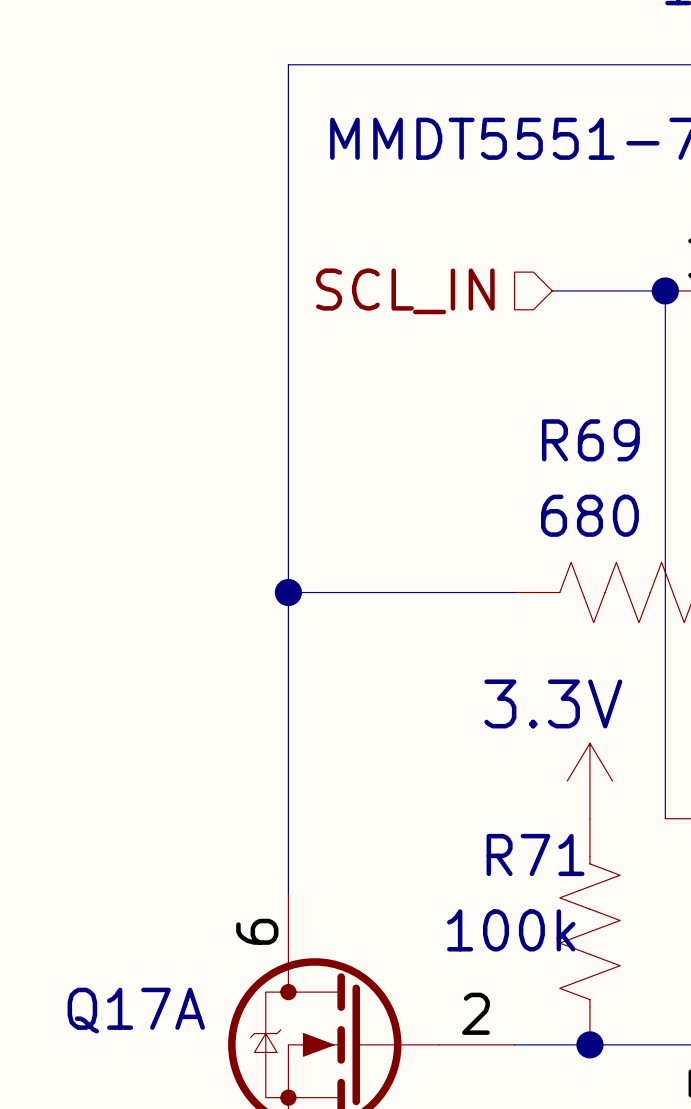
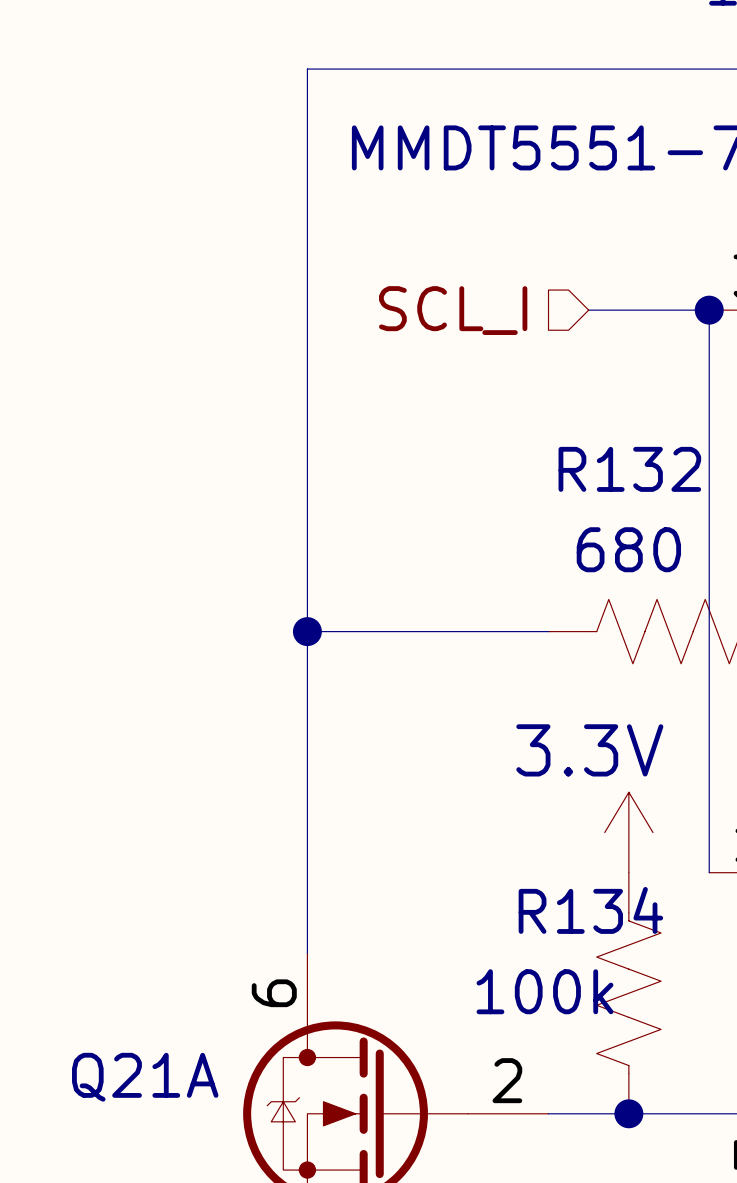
hierarchical label: SCL_IN (405, 291) -> SCL_I (453, 310)
R69 name: R69 (590, 440) -> R132 (629, 469)
R71 name: R71 (535, 854) -> R134 (590, 910)
Q17A name: Q17A (136, 1010) -> Q21A (145, 1077)

